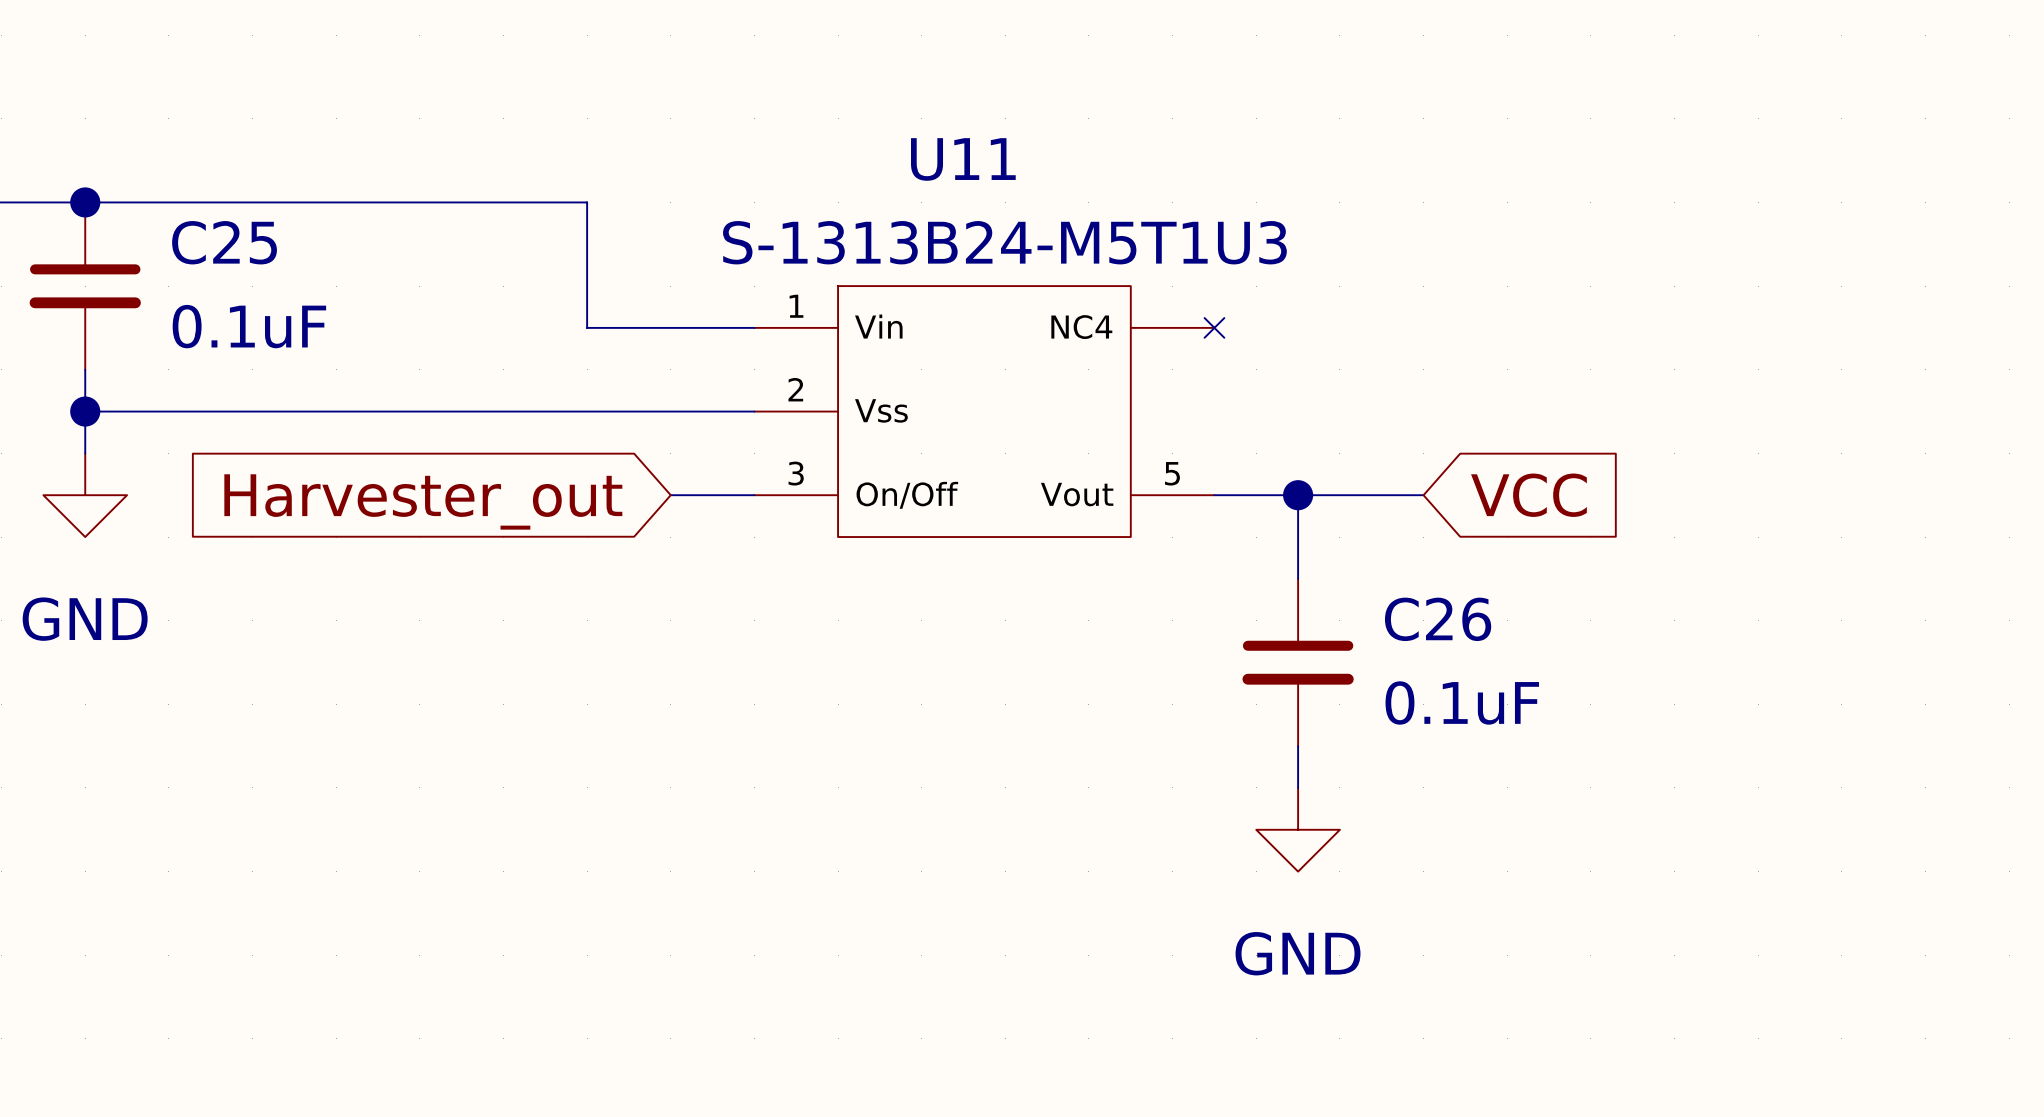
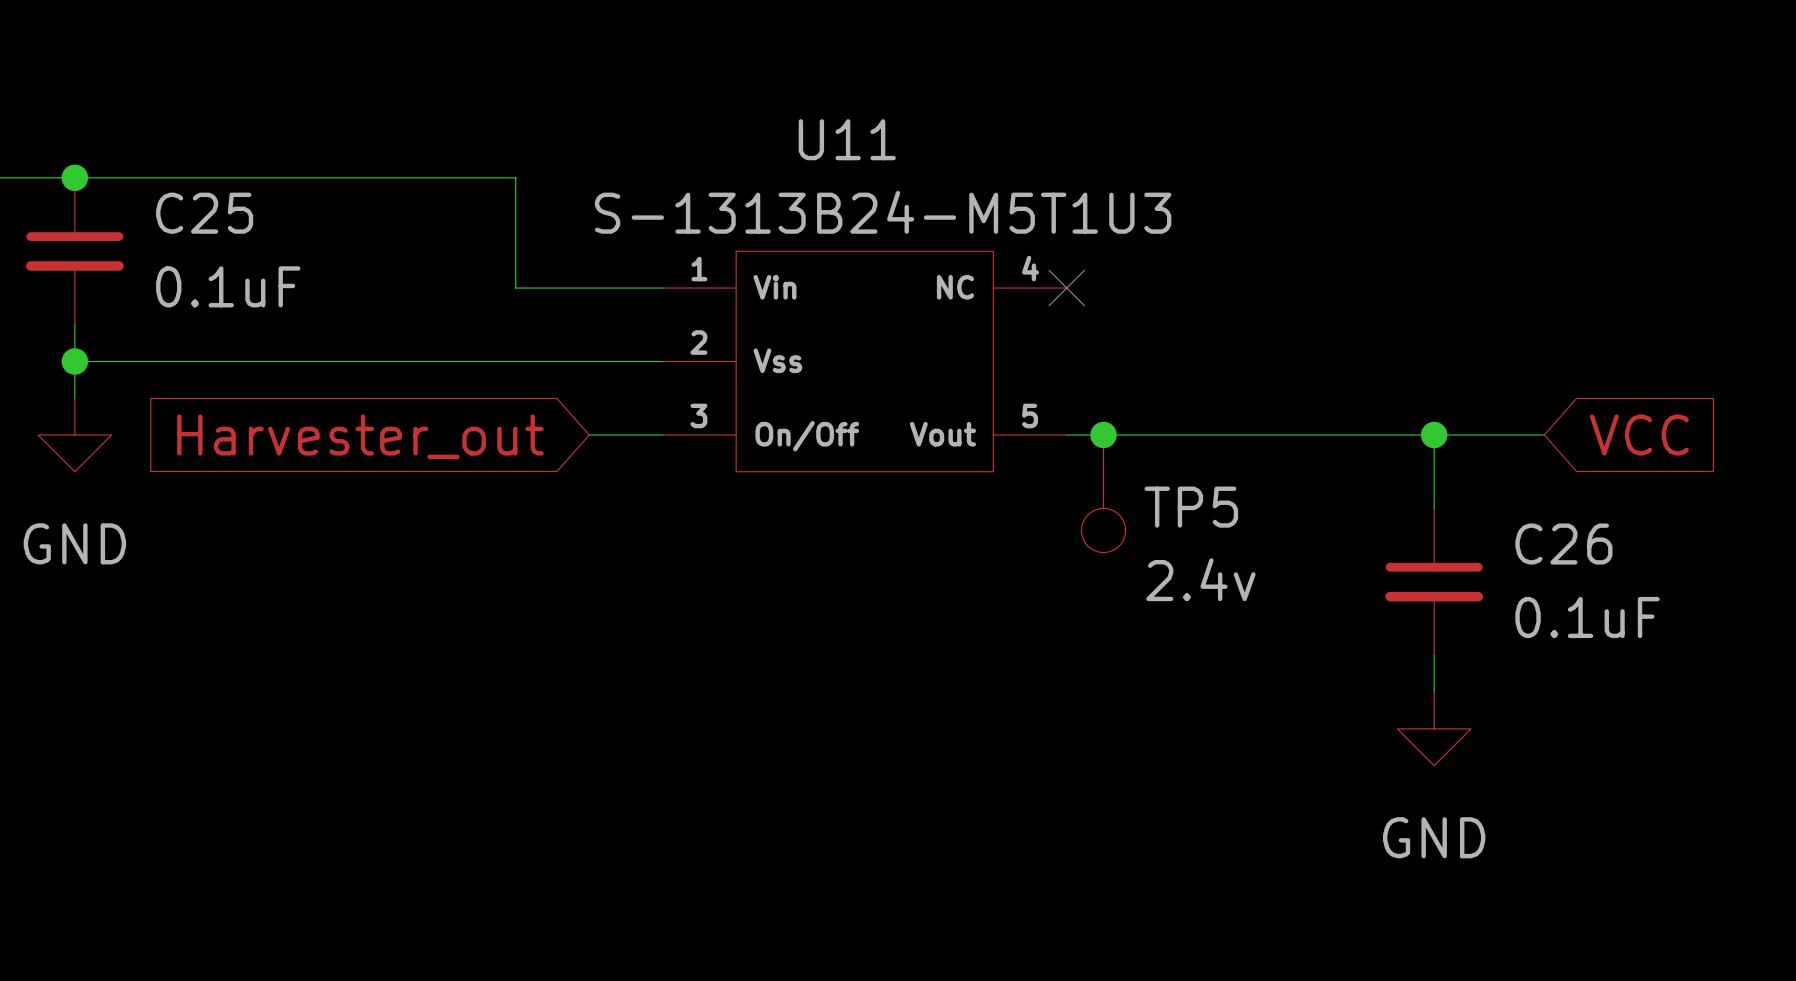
U11 symbol: [754, 286, 1225, 538] -> [662, 251, 1067, 472]
no-connect mark: none -> (1066, 288)
wire: (1298, 495) (1298, 578) -> (1434, 434) (1434, 508)
junction position: (1298, 495) -> (1103, 434)
wire: none -> (1250, 434) (1544, 434)
global label position: VCC (1528, 495) -> VCC (1639, 434)
junction: none -> (1434, 434)
TP5: none -> 2.4v (1103, 493)
C26 position: (1298, 662) -> (1434, 581)
wire: (1298, 746) (1298, 787) -> (1434, 655) (1434, 692)
power symbol position: GND (1298, 829) -> GND (1434, 728)

